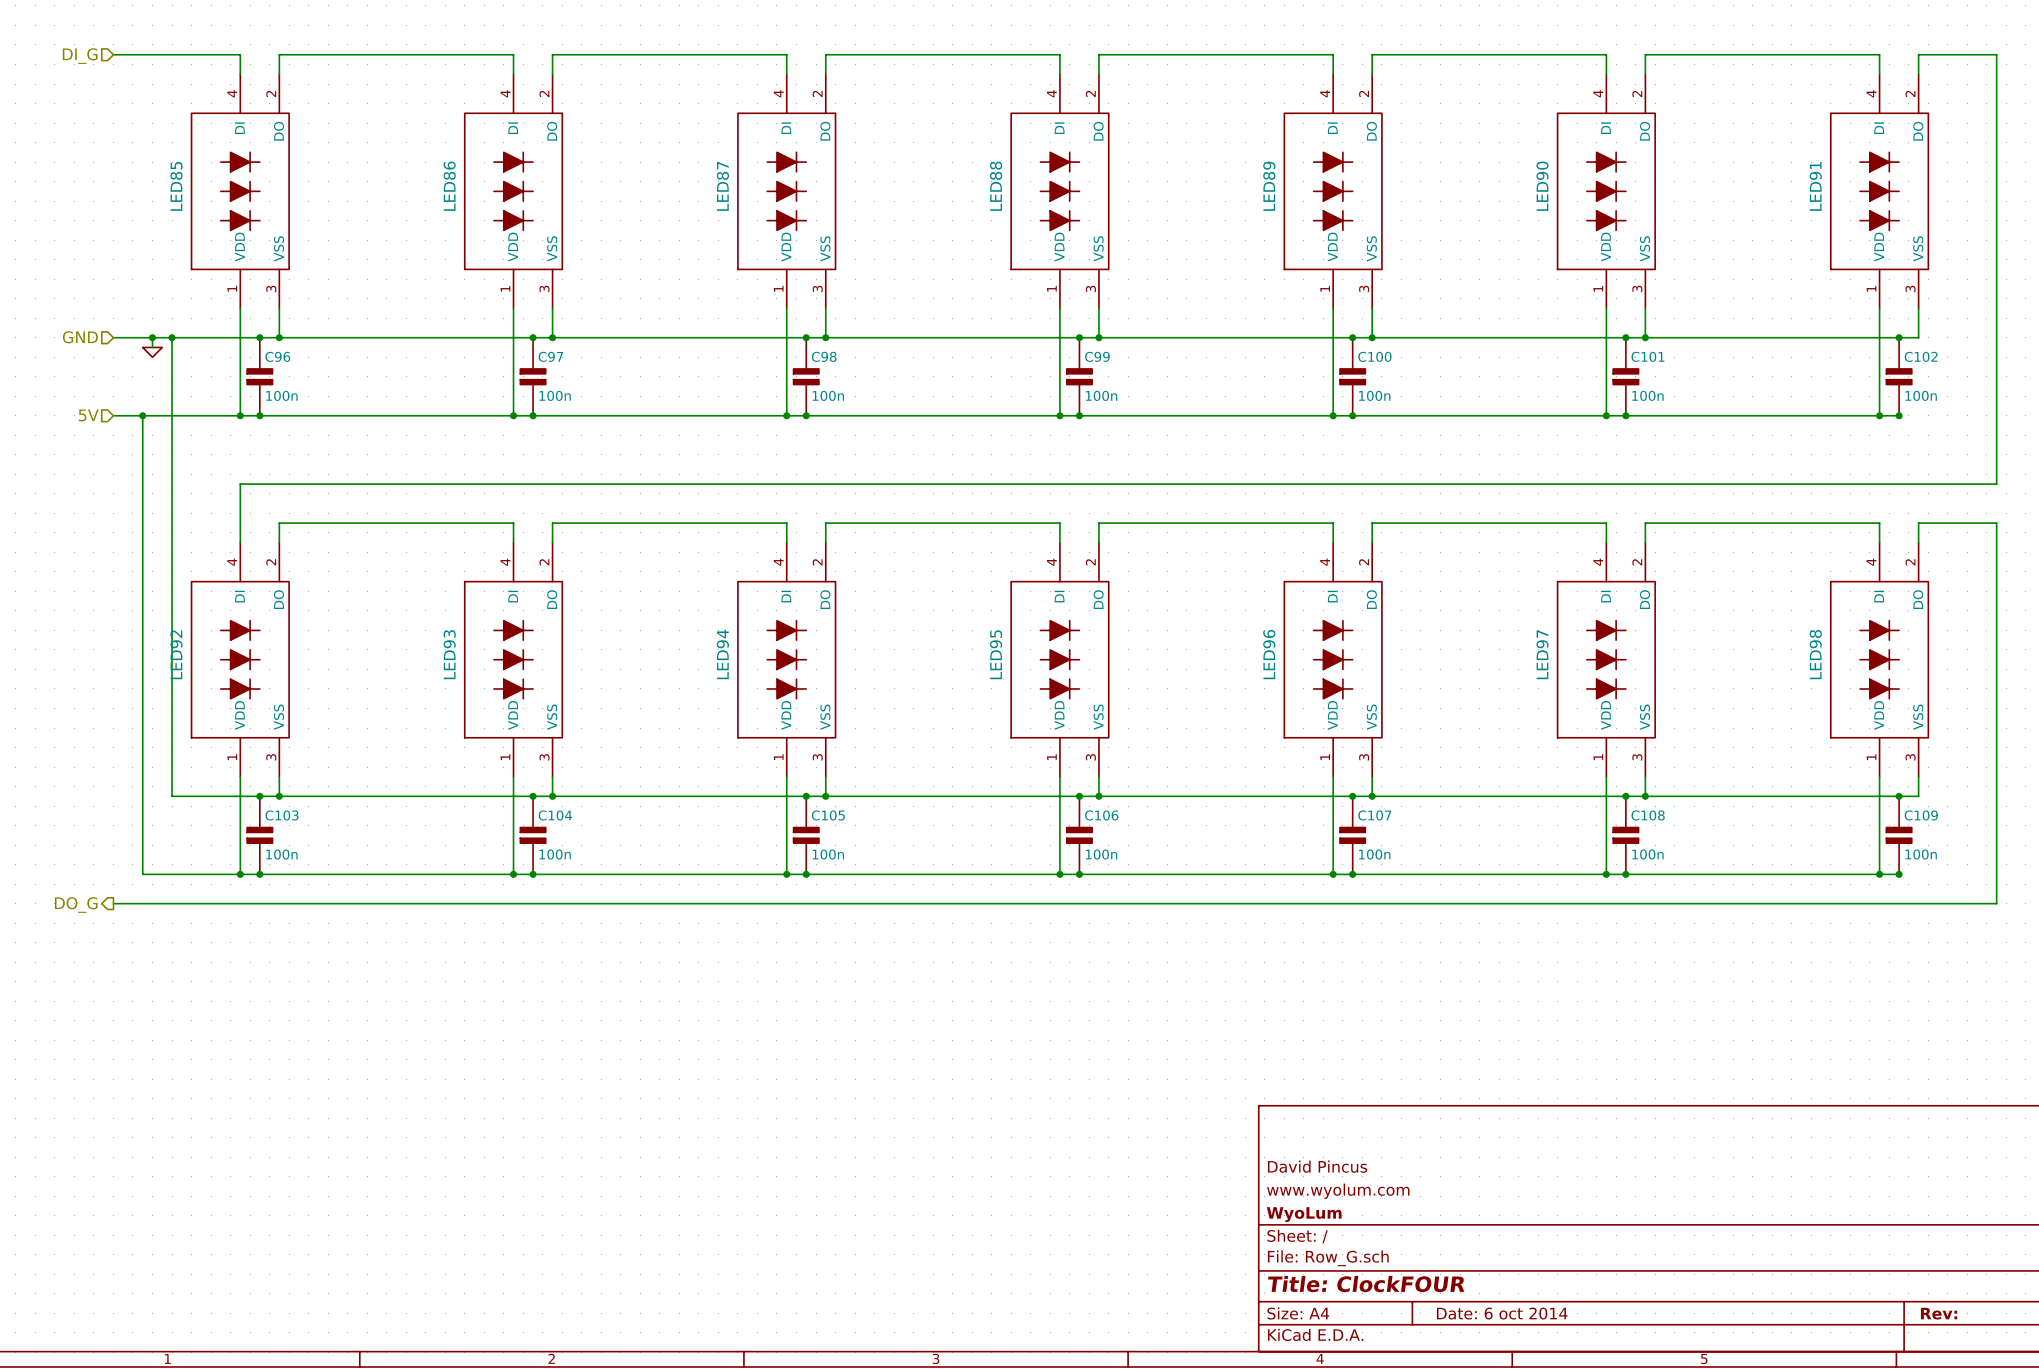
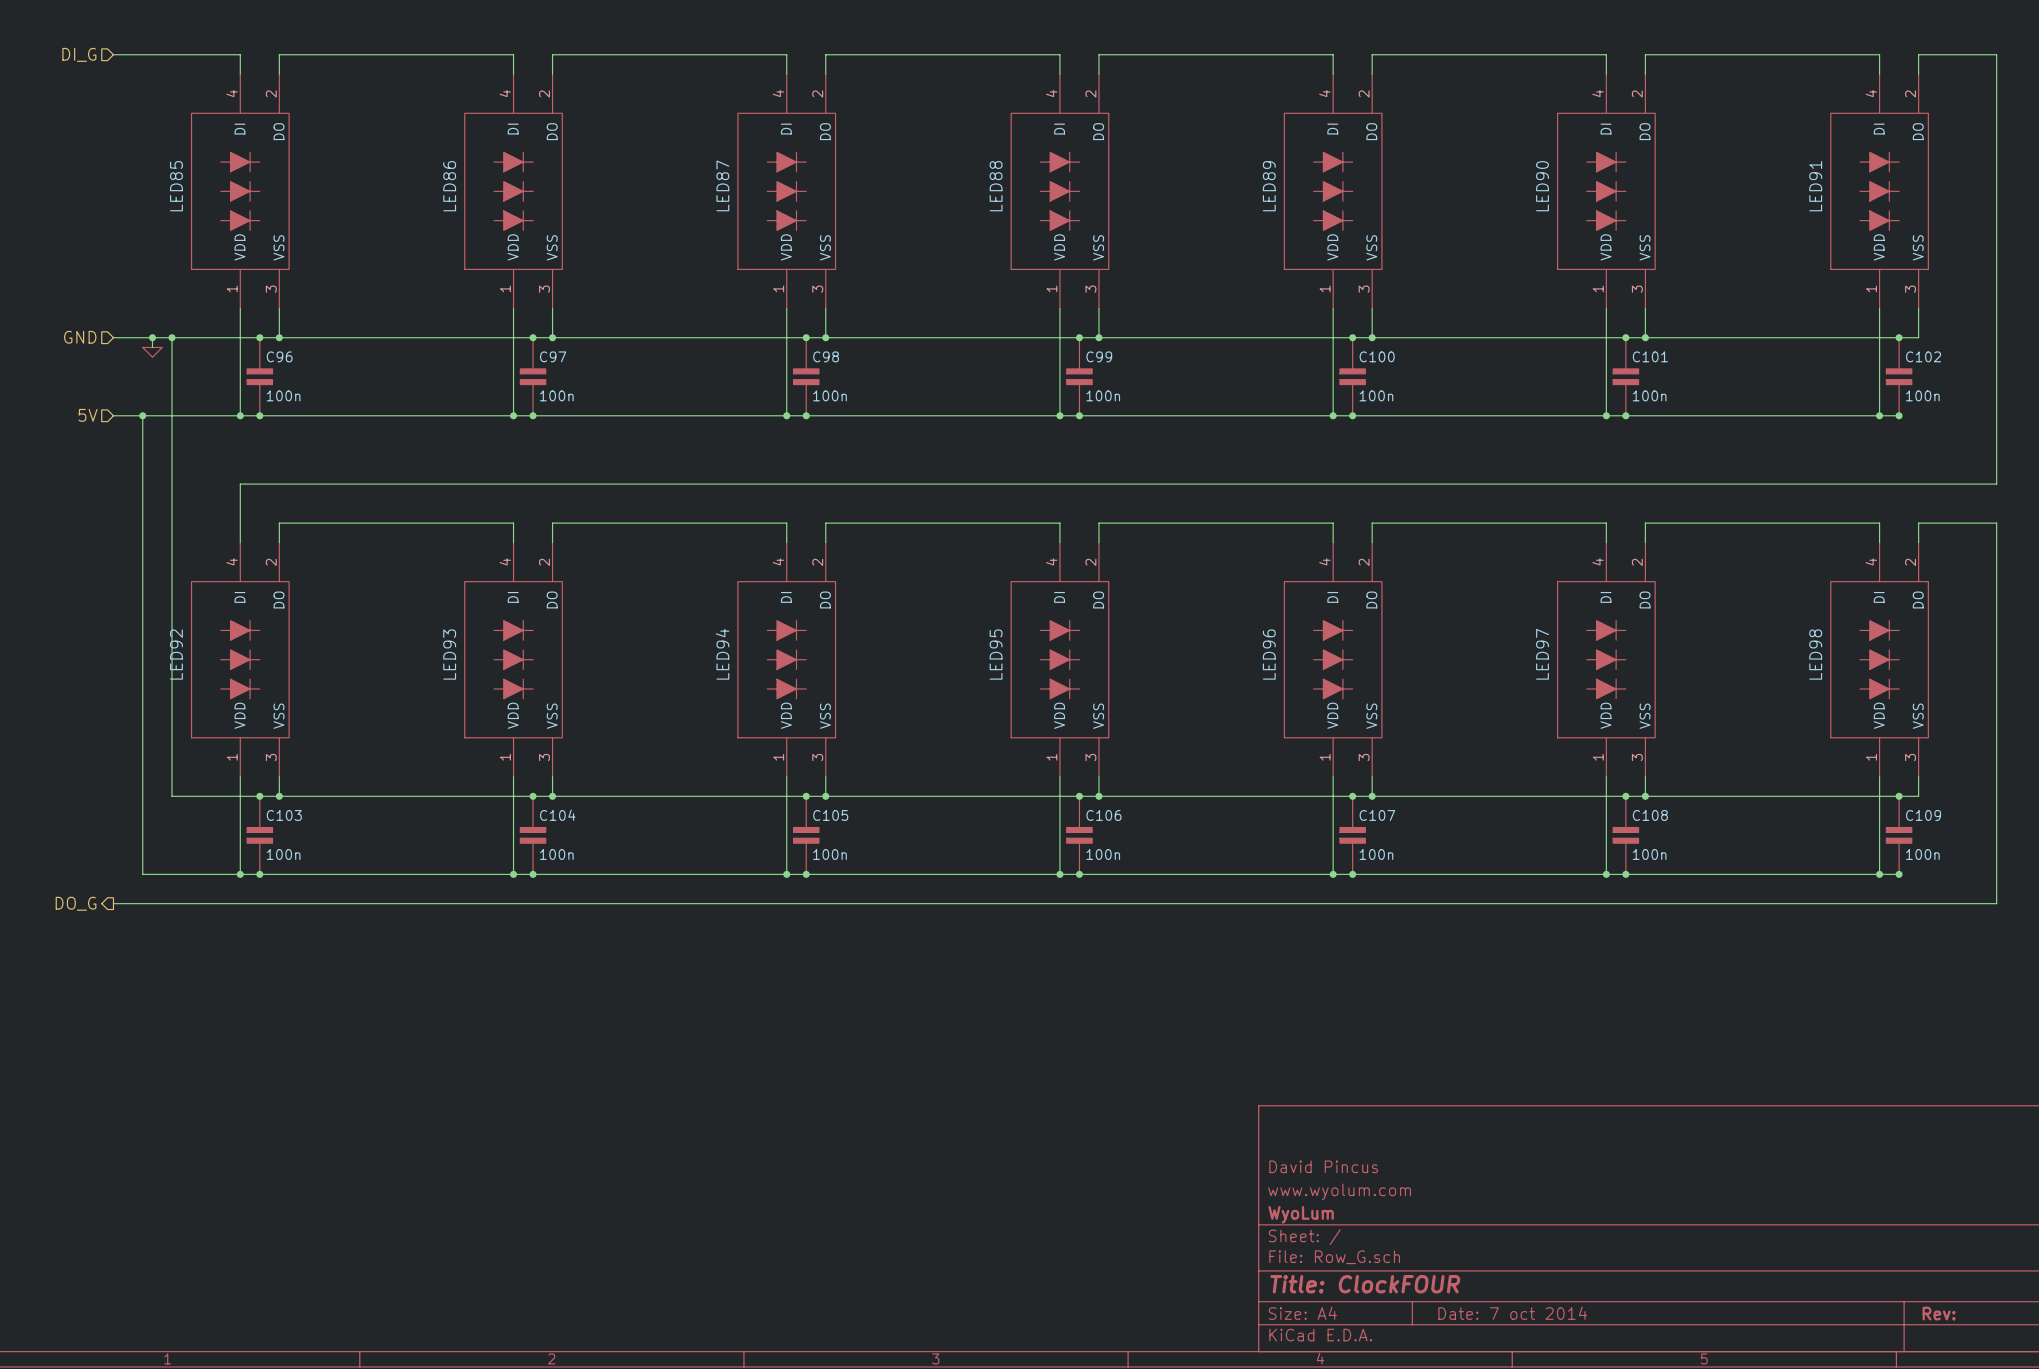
title block: Date: 6 oct 2014 (1502, 1313) -> Date: 7 oct 2014 (1512, 1313)

